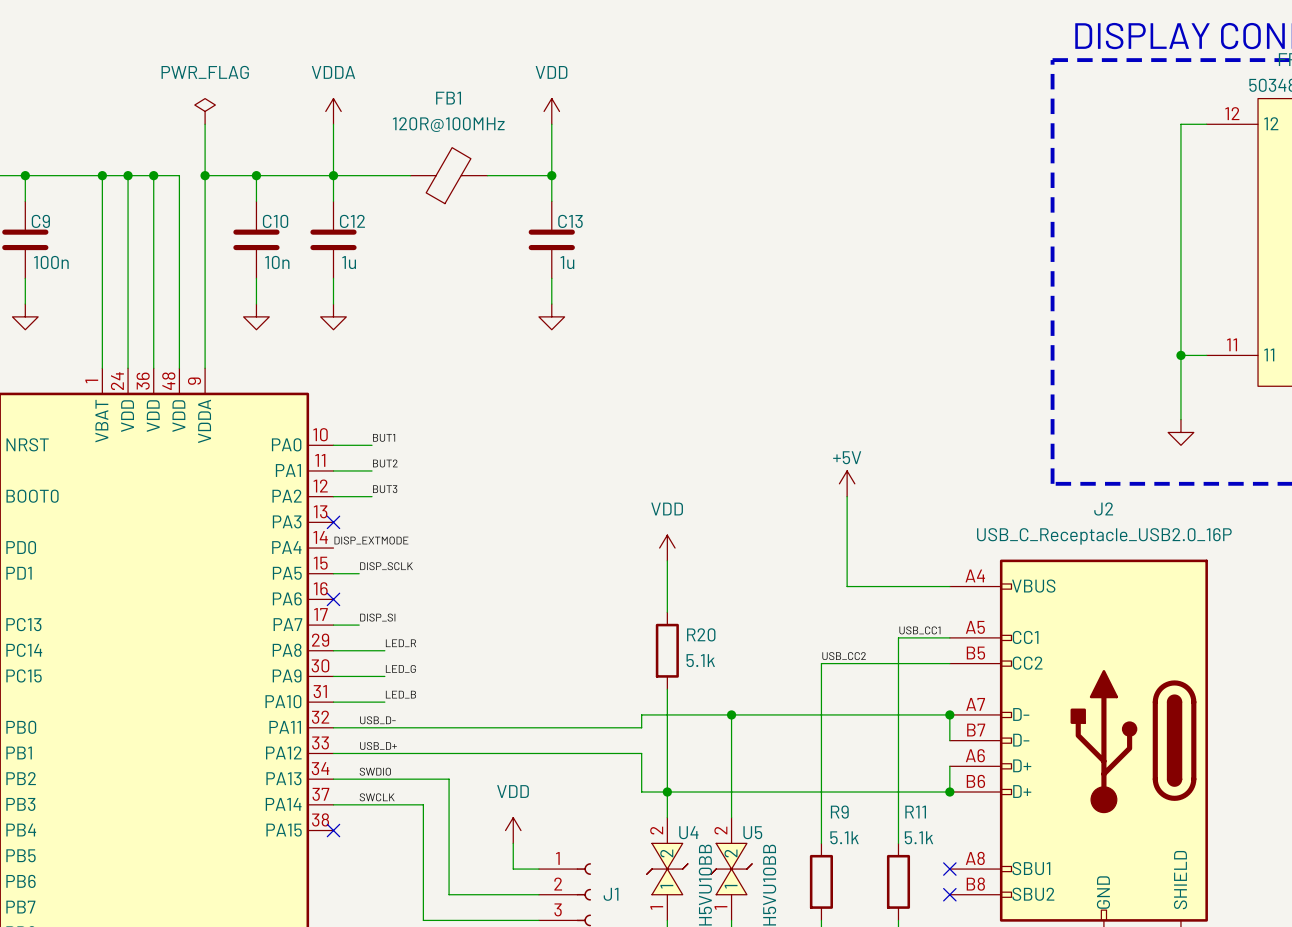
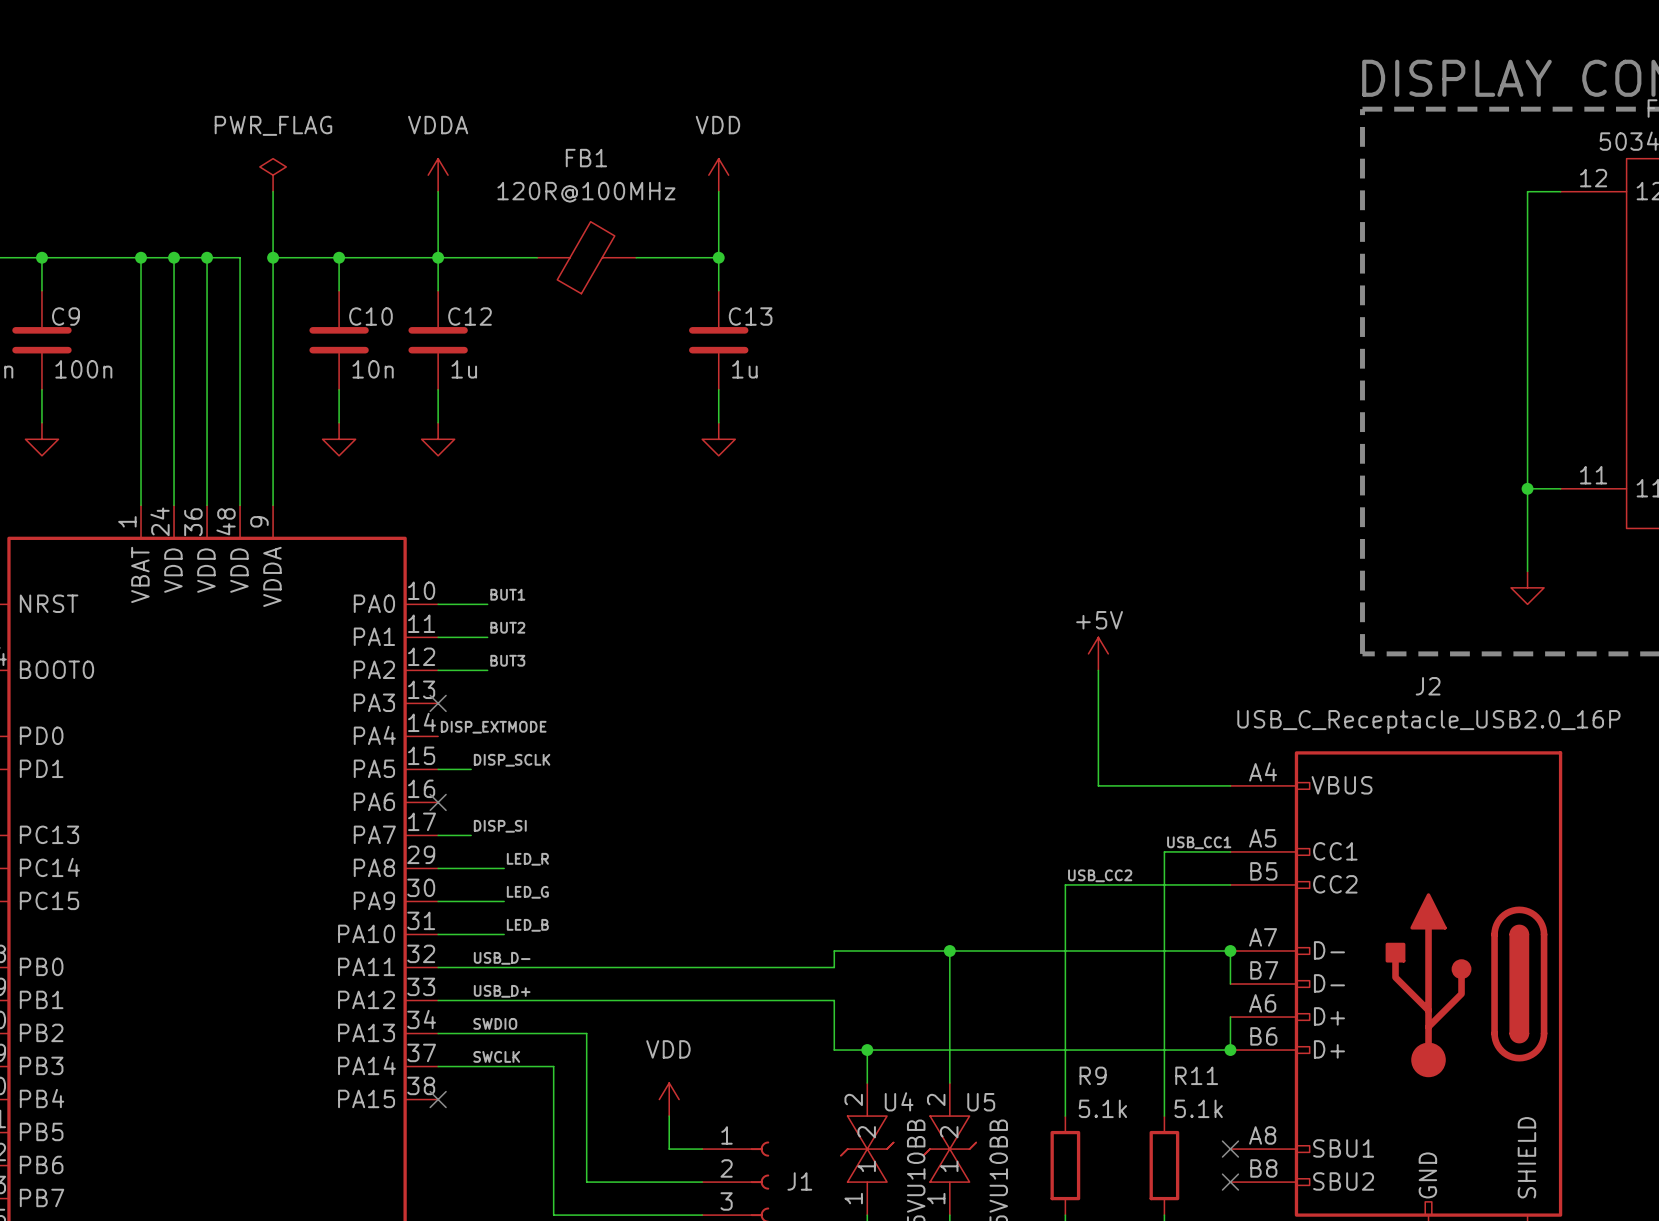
power symbol: VDD (667, 548) -> none
wire: (667, 560) (667, 612) -> none
R20: 5.1k (667, 650) -> none
wire: (667, 689) (667, 792) -> none

